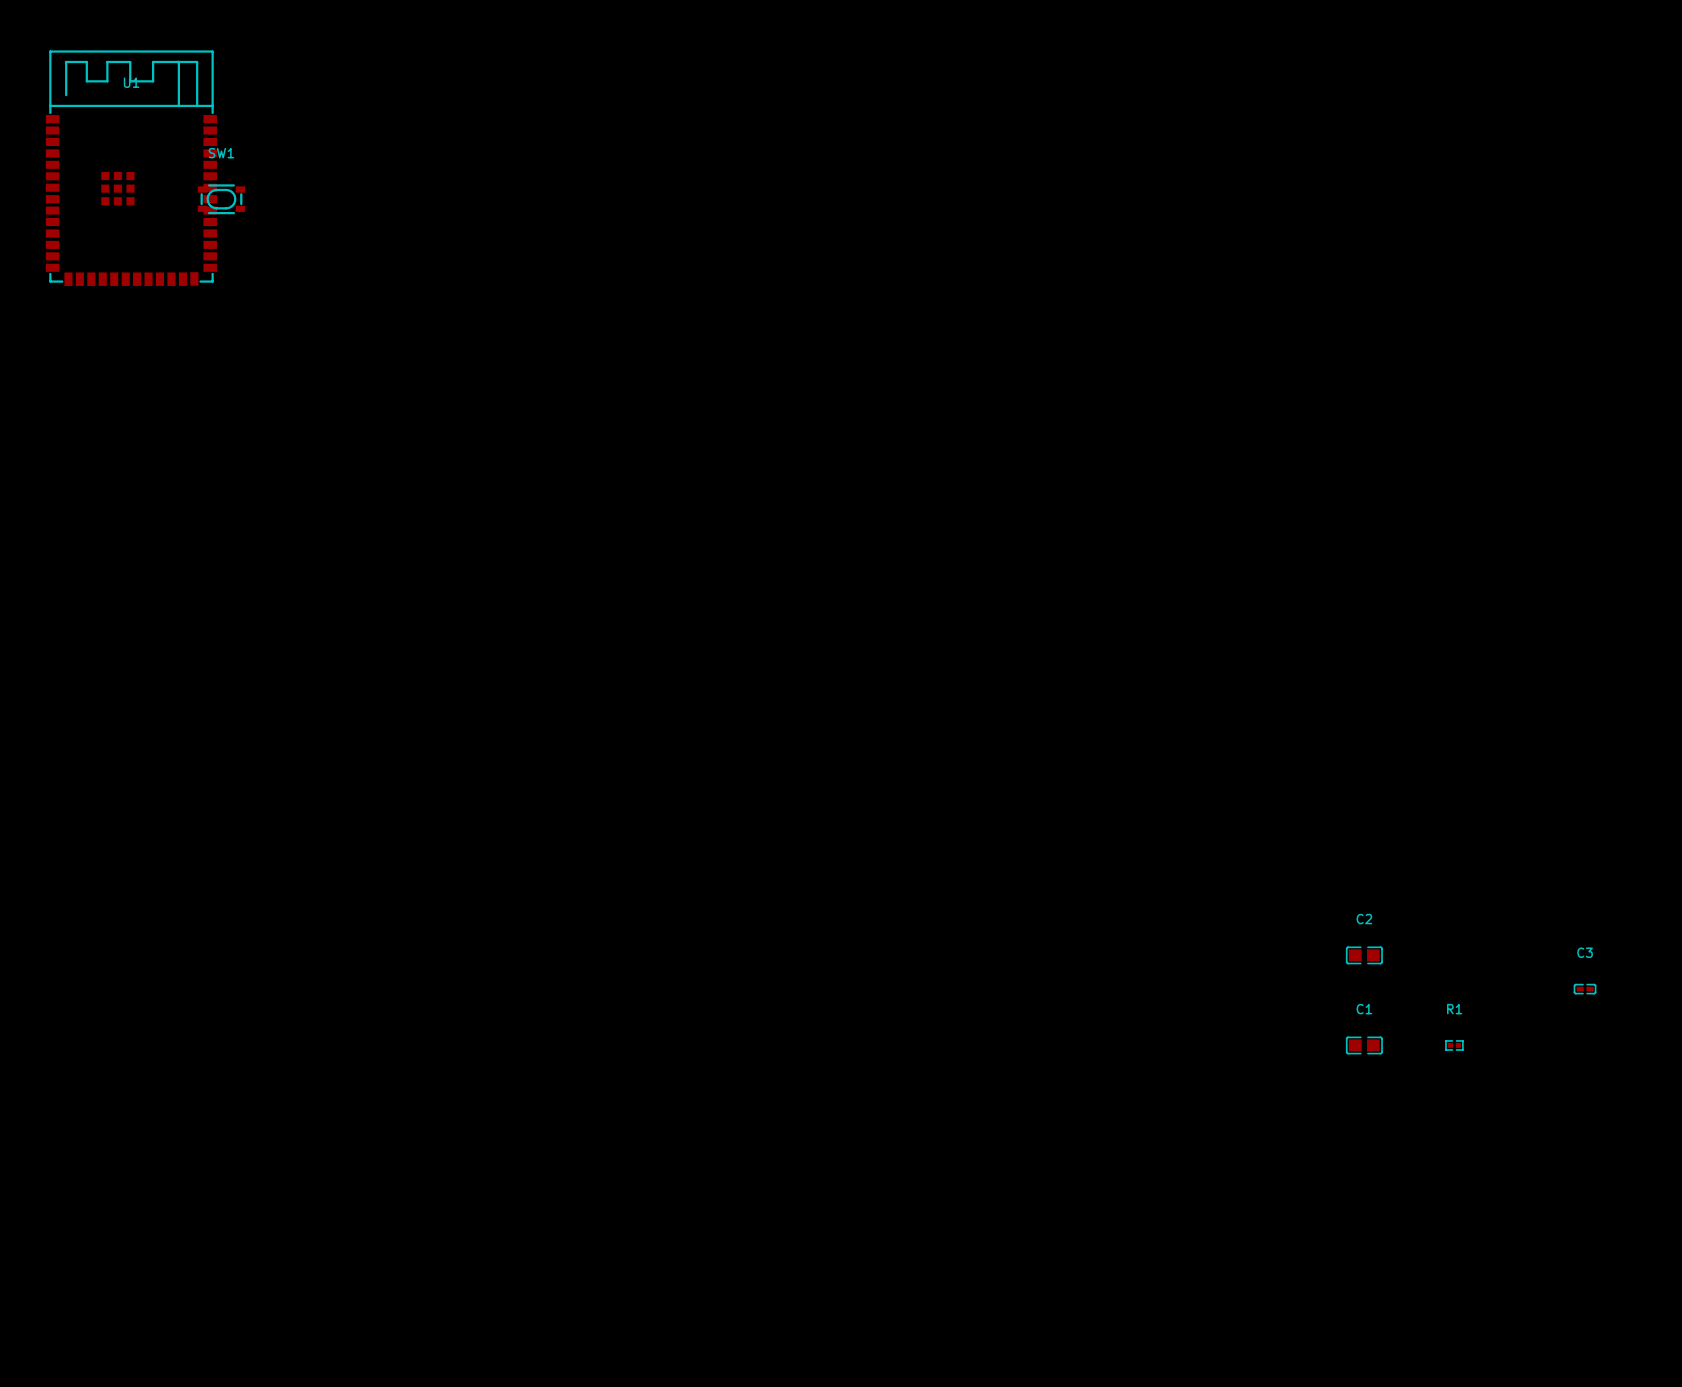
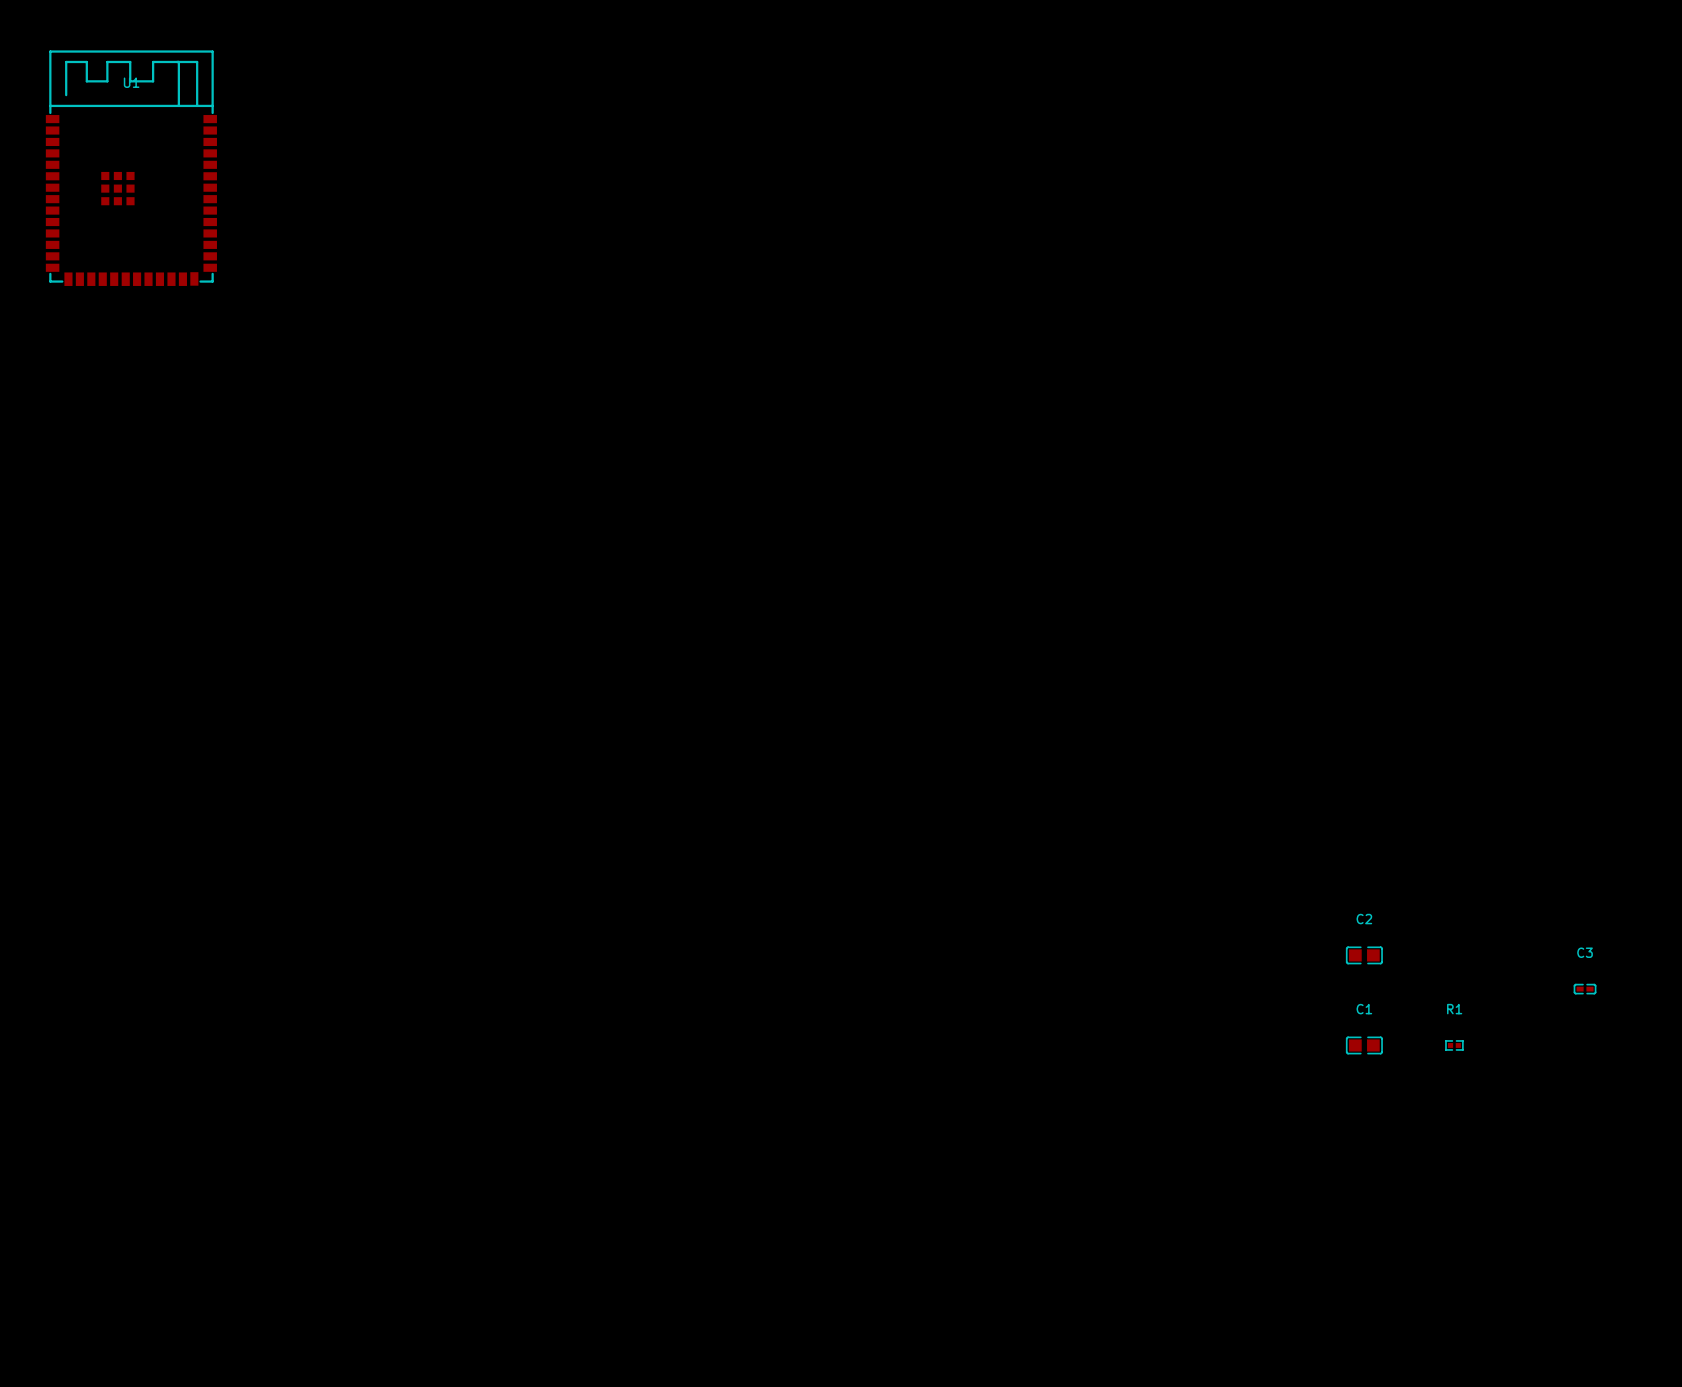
SW1: (221, 199) -> none

